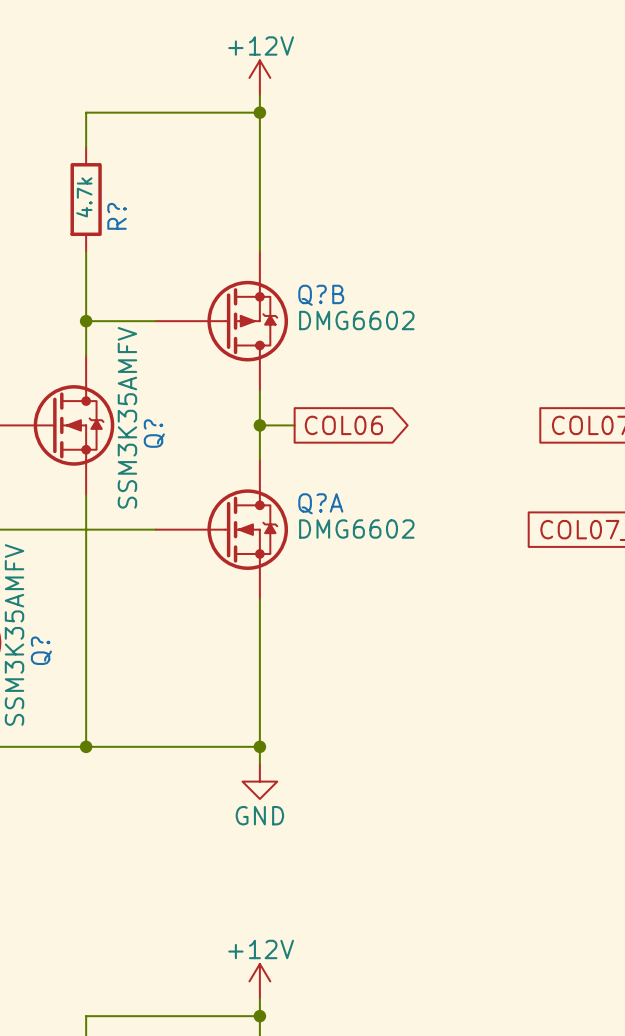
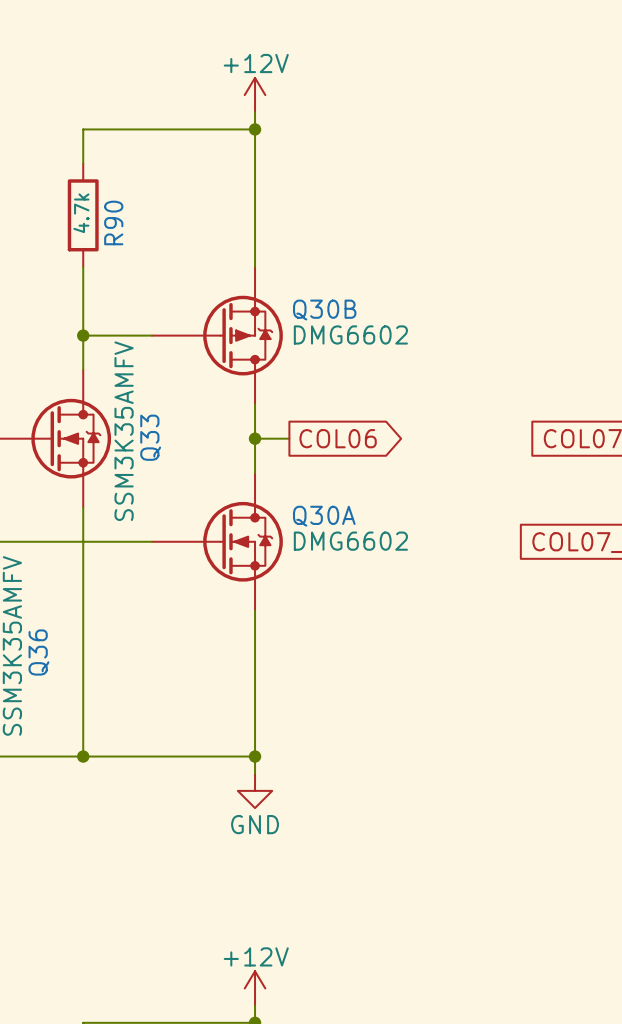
R? name: R? (117, 216) -> R90 (113, 222)
Q?B name: Q?B (321, 295) -> Q30B (324, 310)
Q? name: Q? (154, 433) -> Q33 (150, 437)
Q?A name: Q?A (320, 503) -> Q30A (324, 516)
Q? name: Q? (41, 650) -> Q36 (38, 652)

